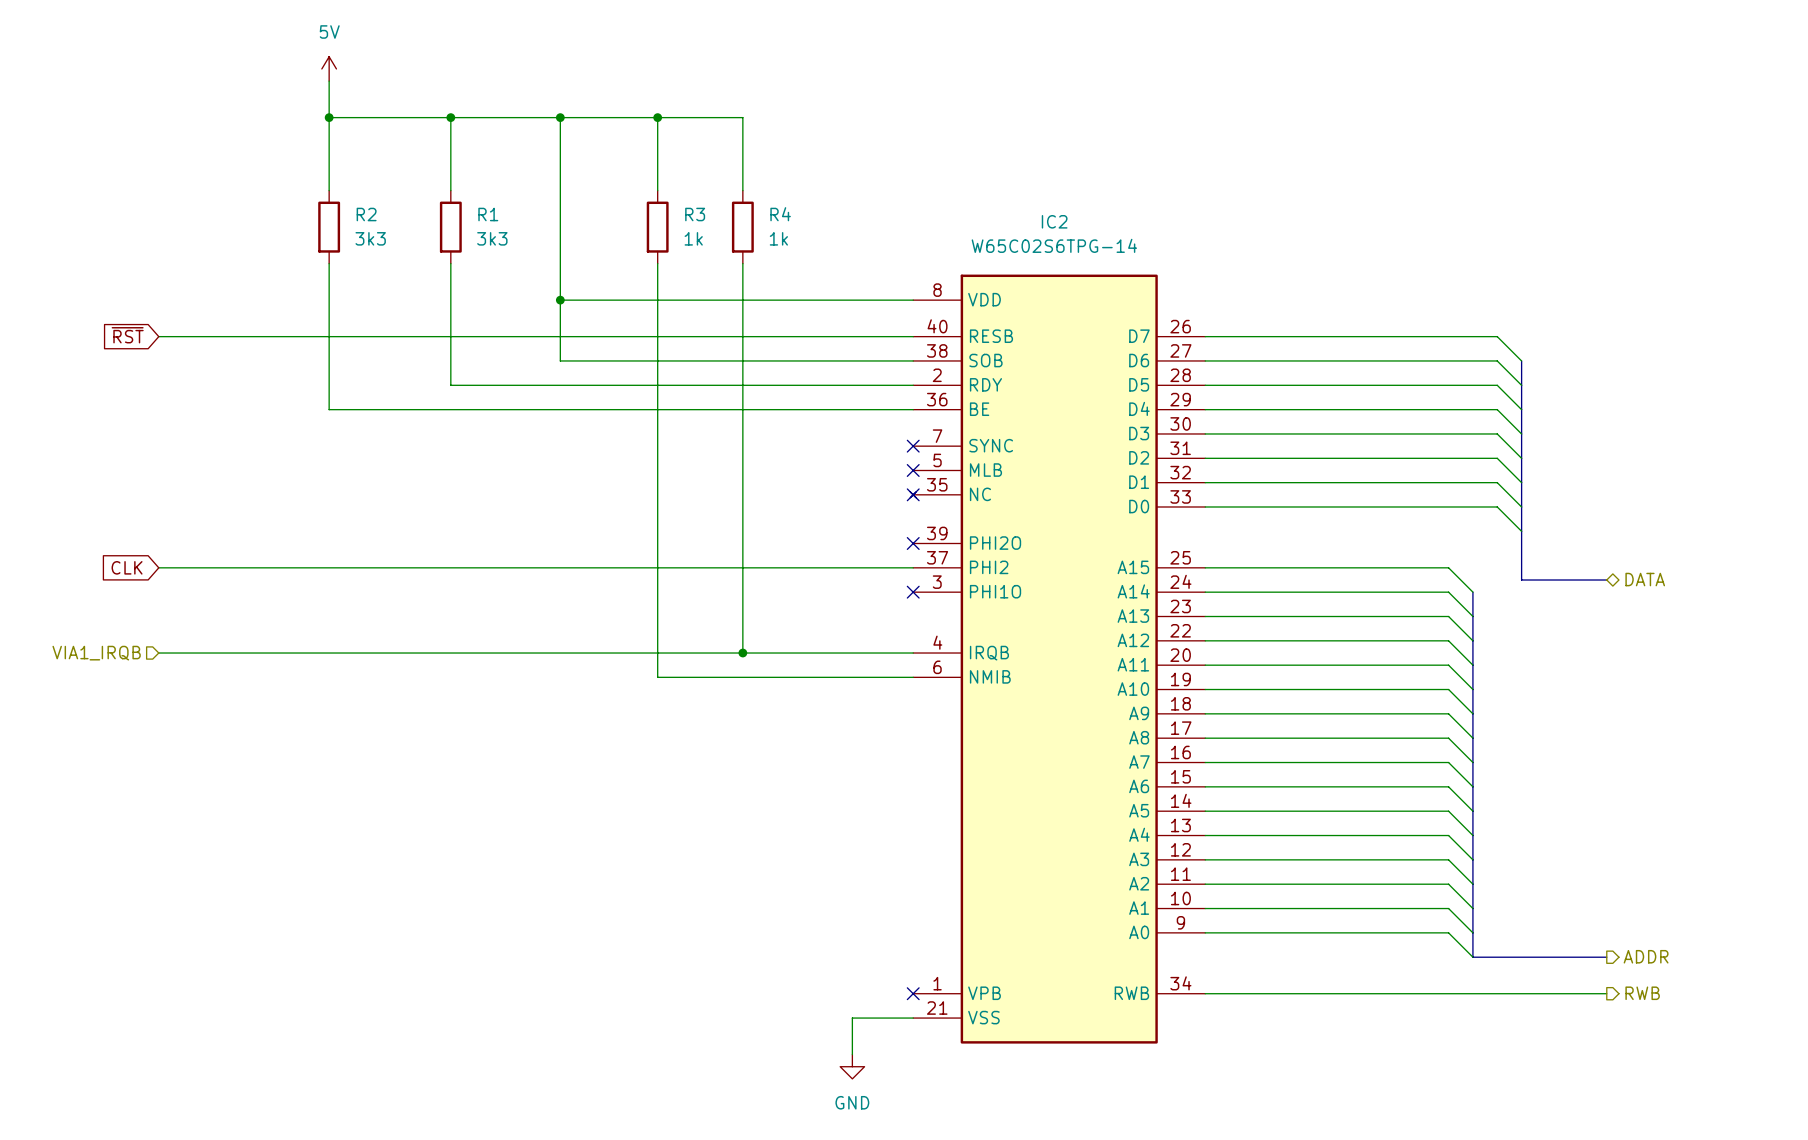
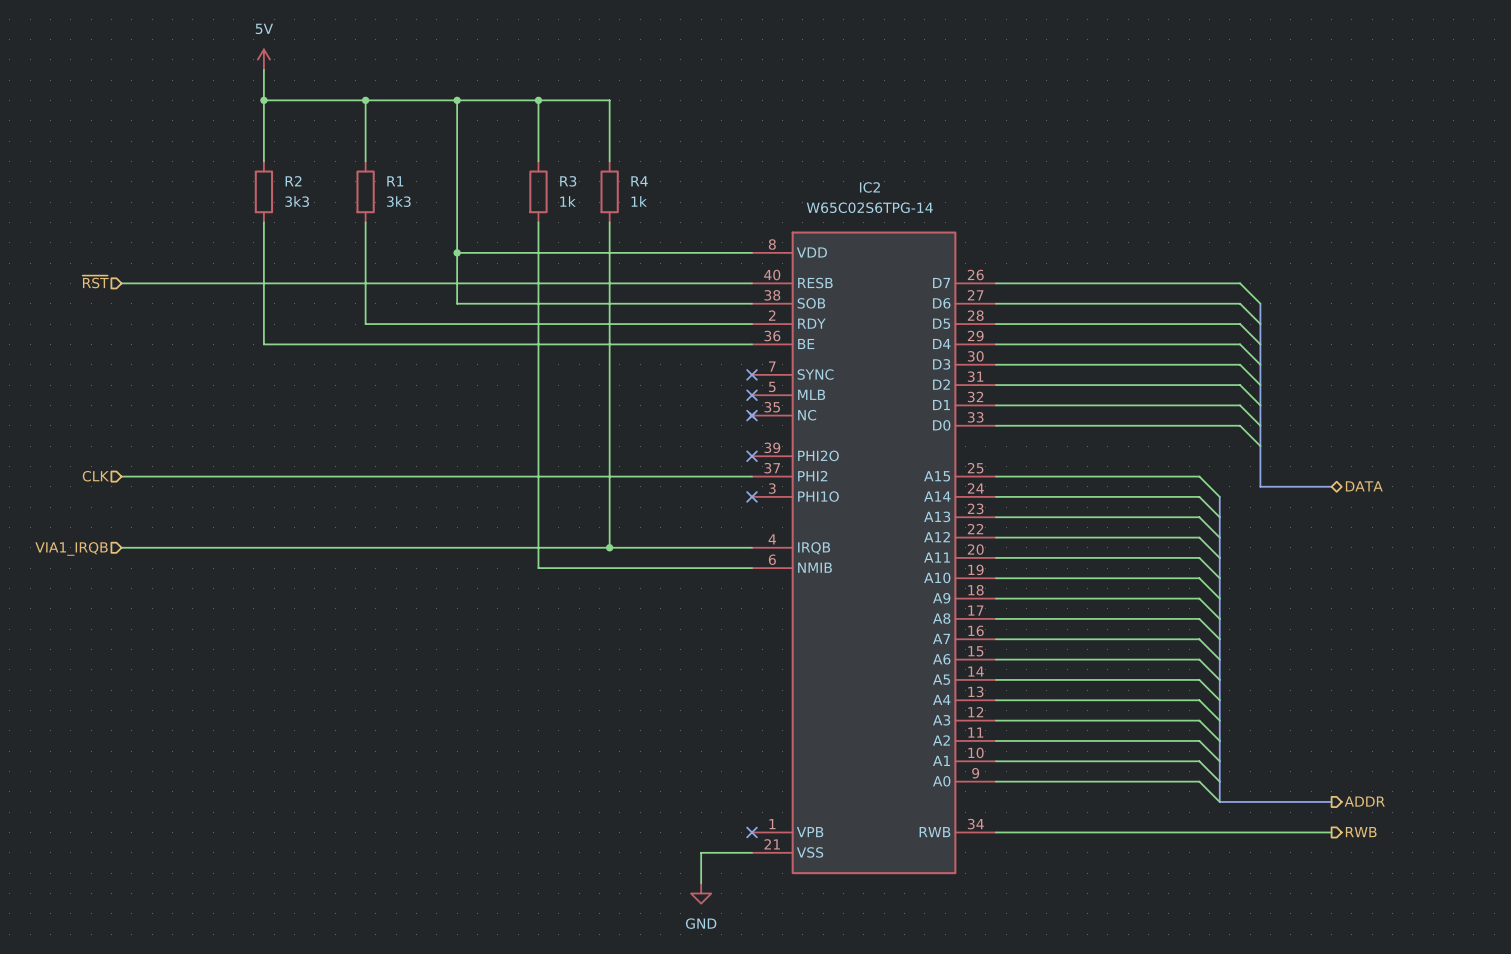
hierarchical label: none -> ~{RST} (95, 281)
global label: ~{RST} (127, 335) -> none
hierarchical label: none -> CLK (95, 476)
global label: CLK (127, 567) -> none

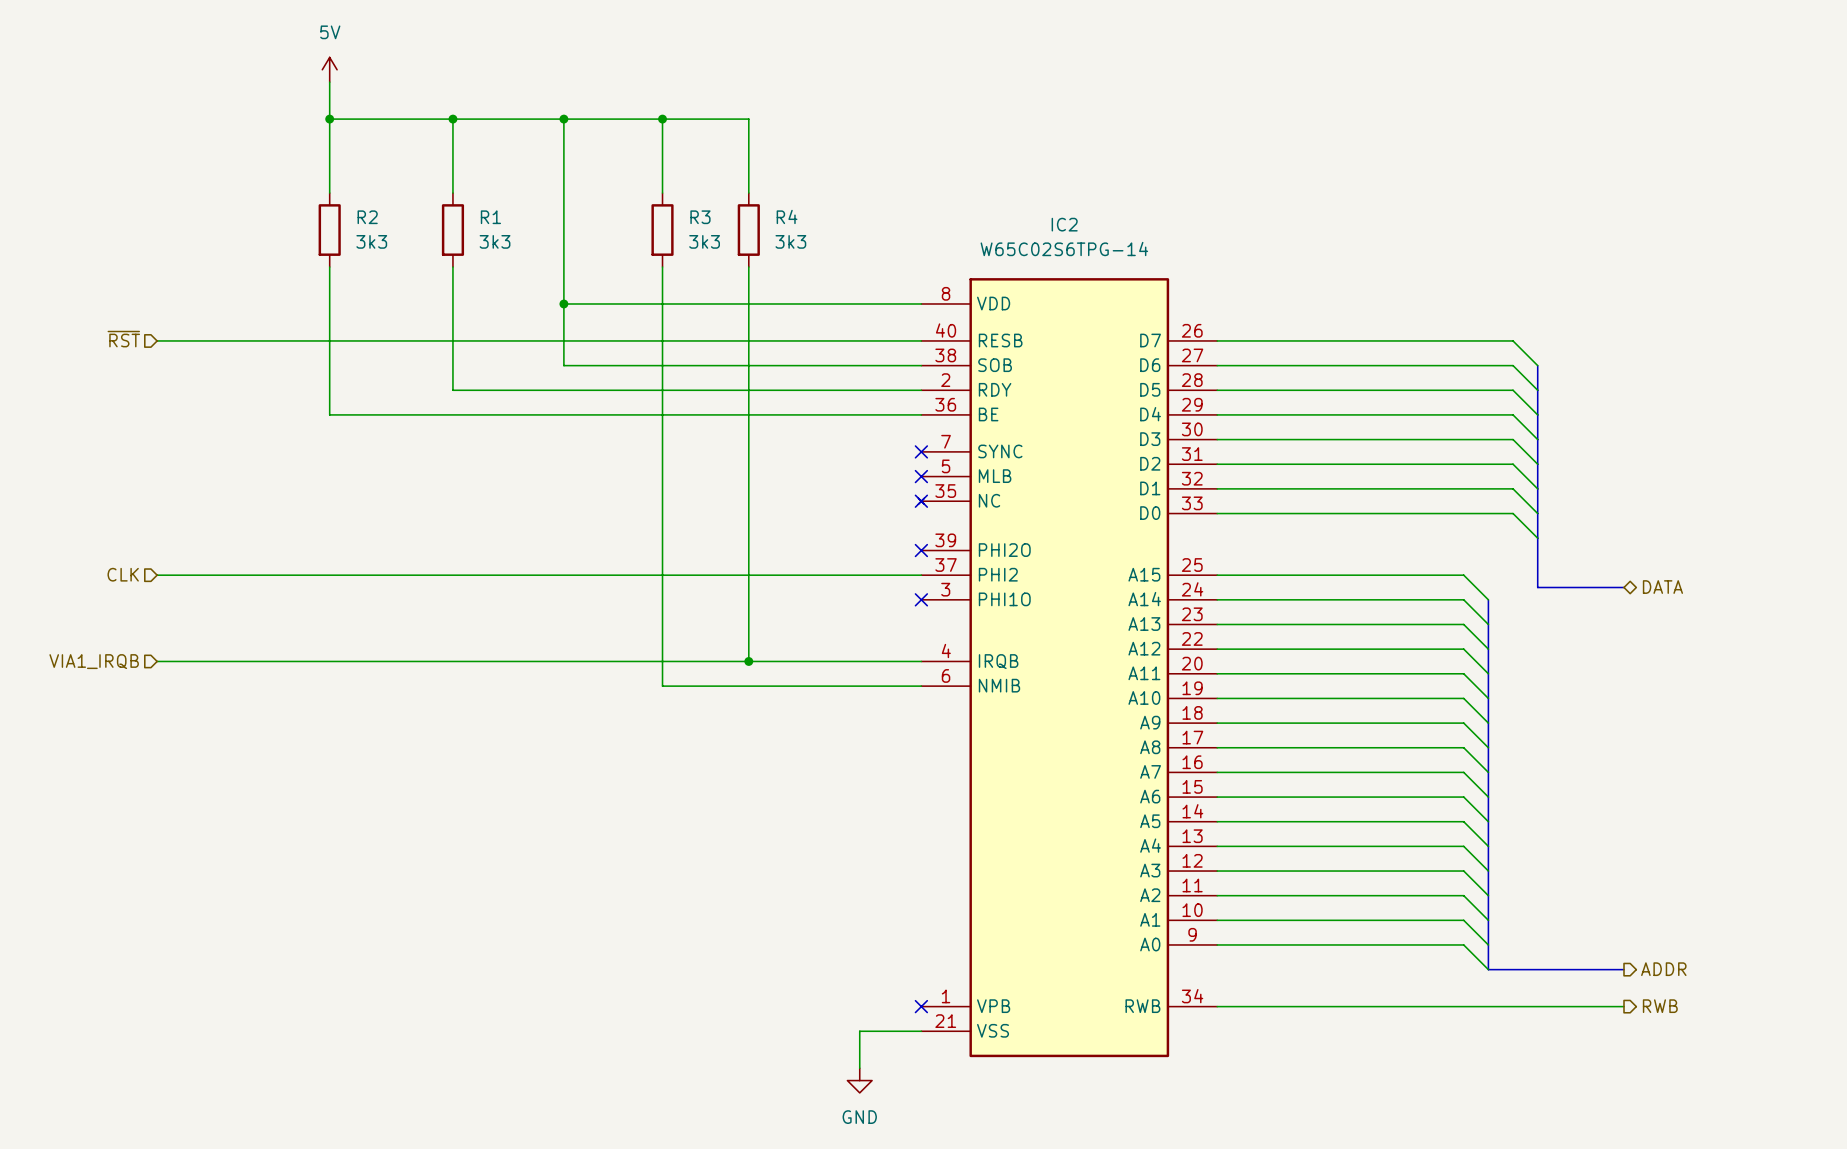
R3 value: 1k (568, 201) -> 3k3 (704, 241)
R4 value: 1k (639, 201) -> 3k3 (790, 241)

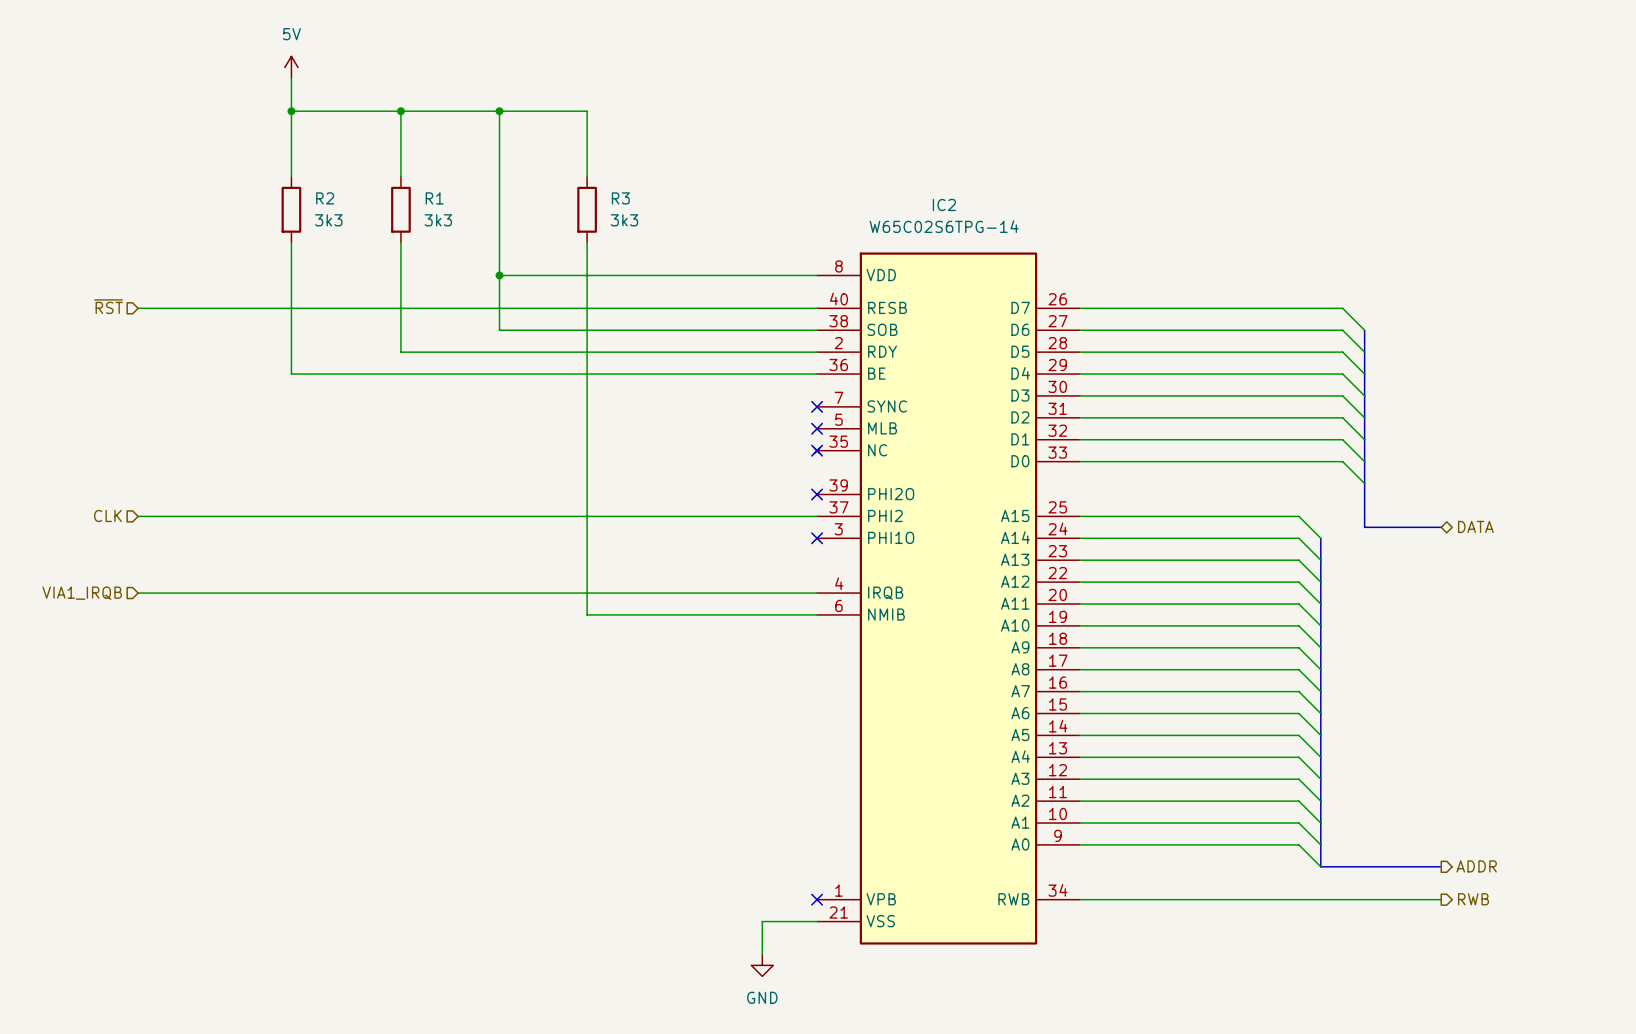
wire: (662, 119) (748, 119) (748, 193) -> none
junction: (662, 119) -> none
R4: 3k3 (748, 230) -> none
wire: (748, 267) (748, 661) -> none
junction: (748, 661) -> none

